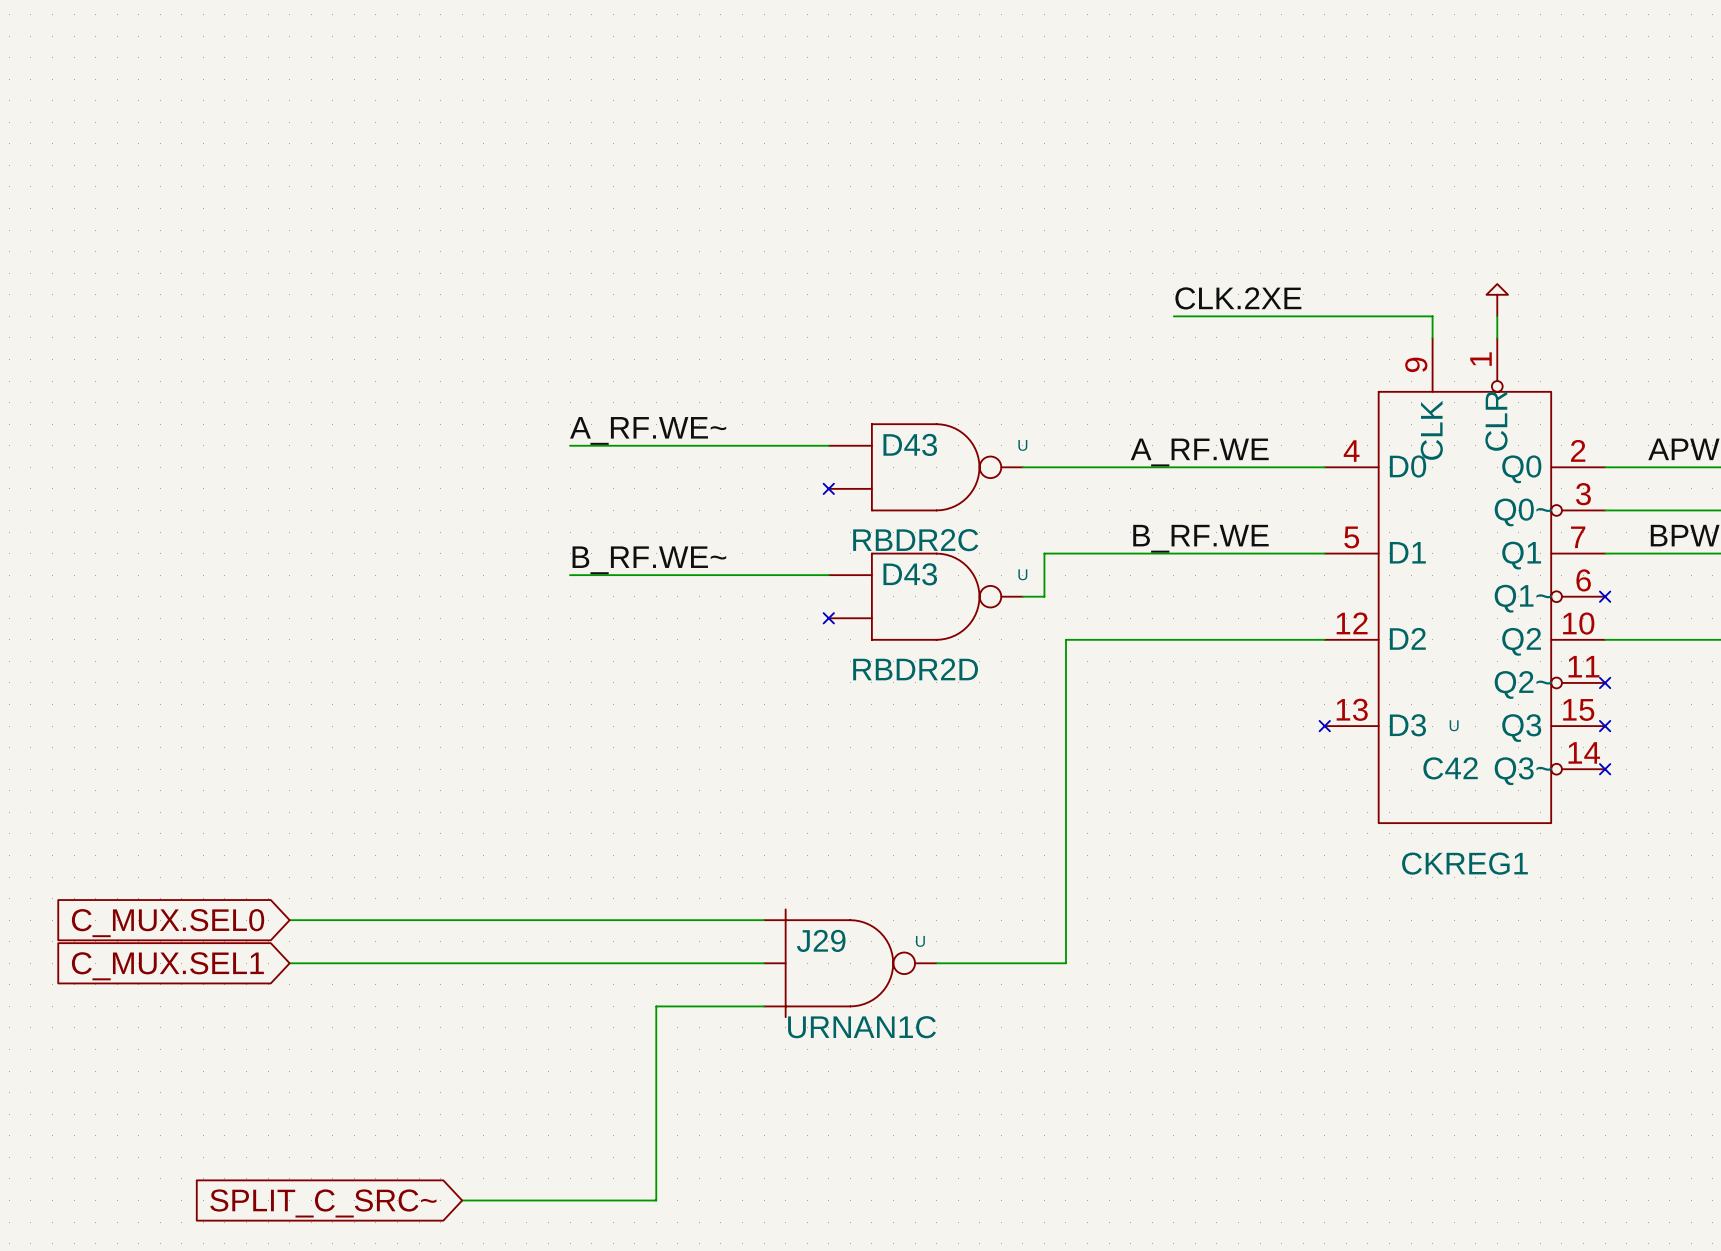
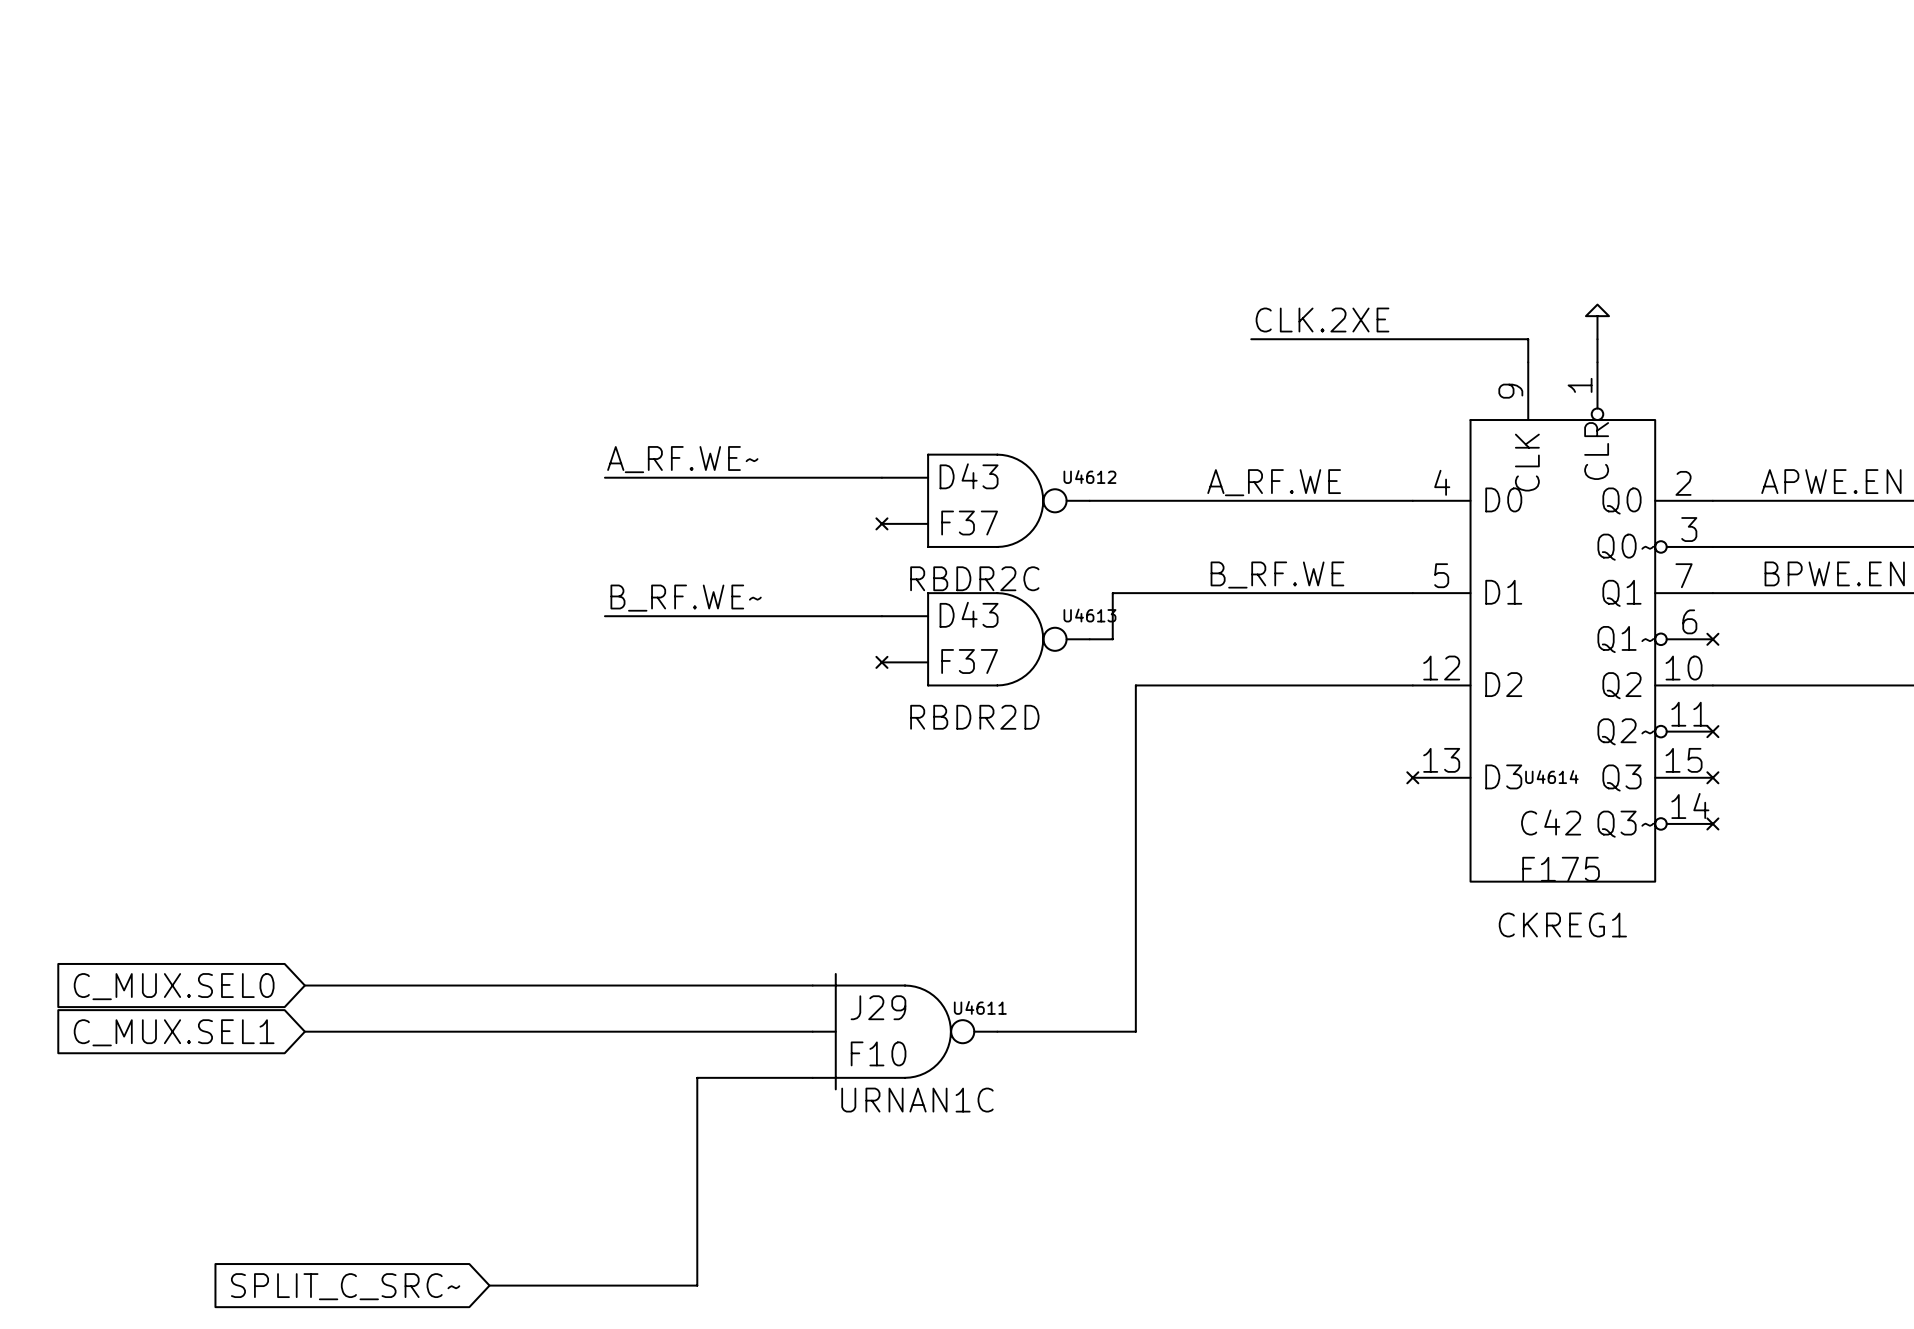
U name: U (1022, 445) -> U4612 (1089, 477)
U value: none -> F37 (969, 523)
U name: U (1022, 574) -> U4613 (1089, 615)
U value: none -> F37 (969, 661)
U name: U (1454, 725) -> U4614 (1551, 777)
U value: none -> F175 (1561, 869)
U name: U (920, 941) -> U4611 (980, 1007)
U value: none -> F10 (878, 1053)

